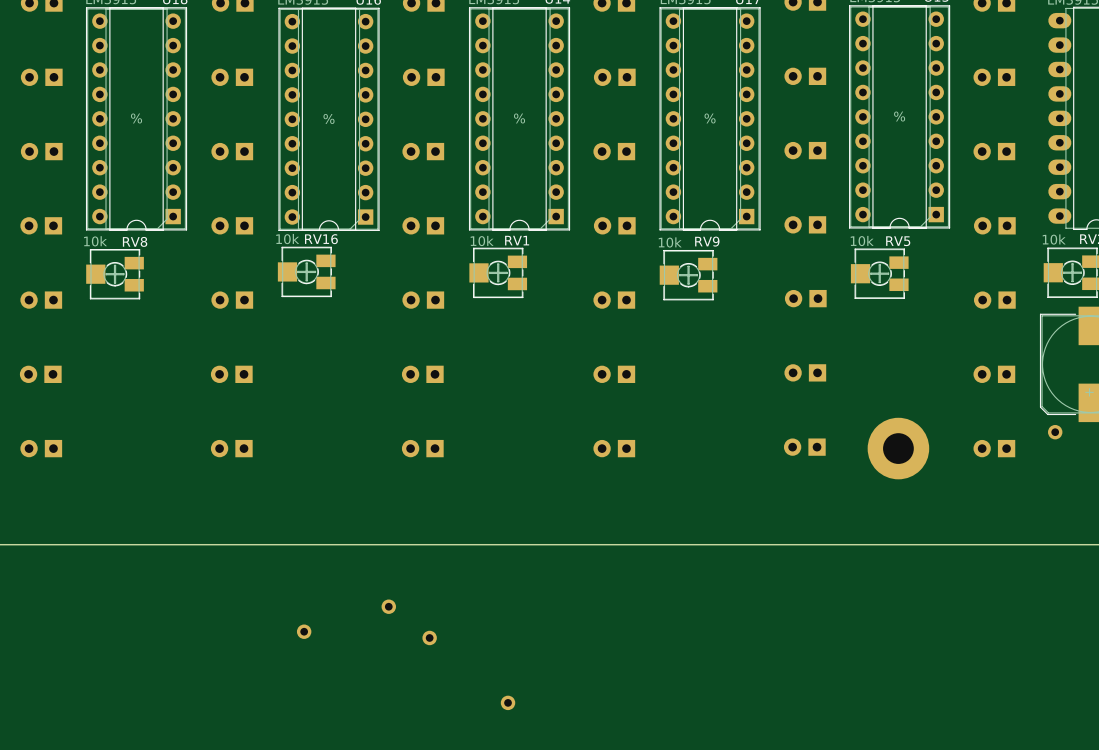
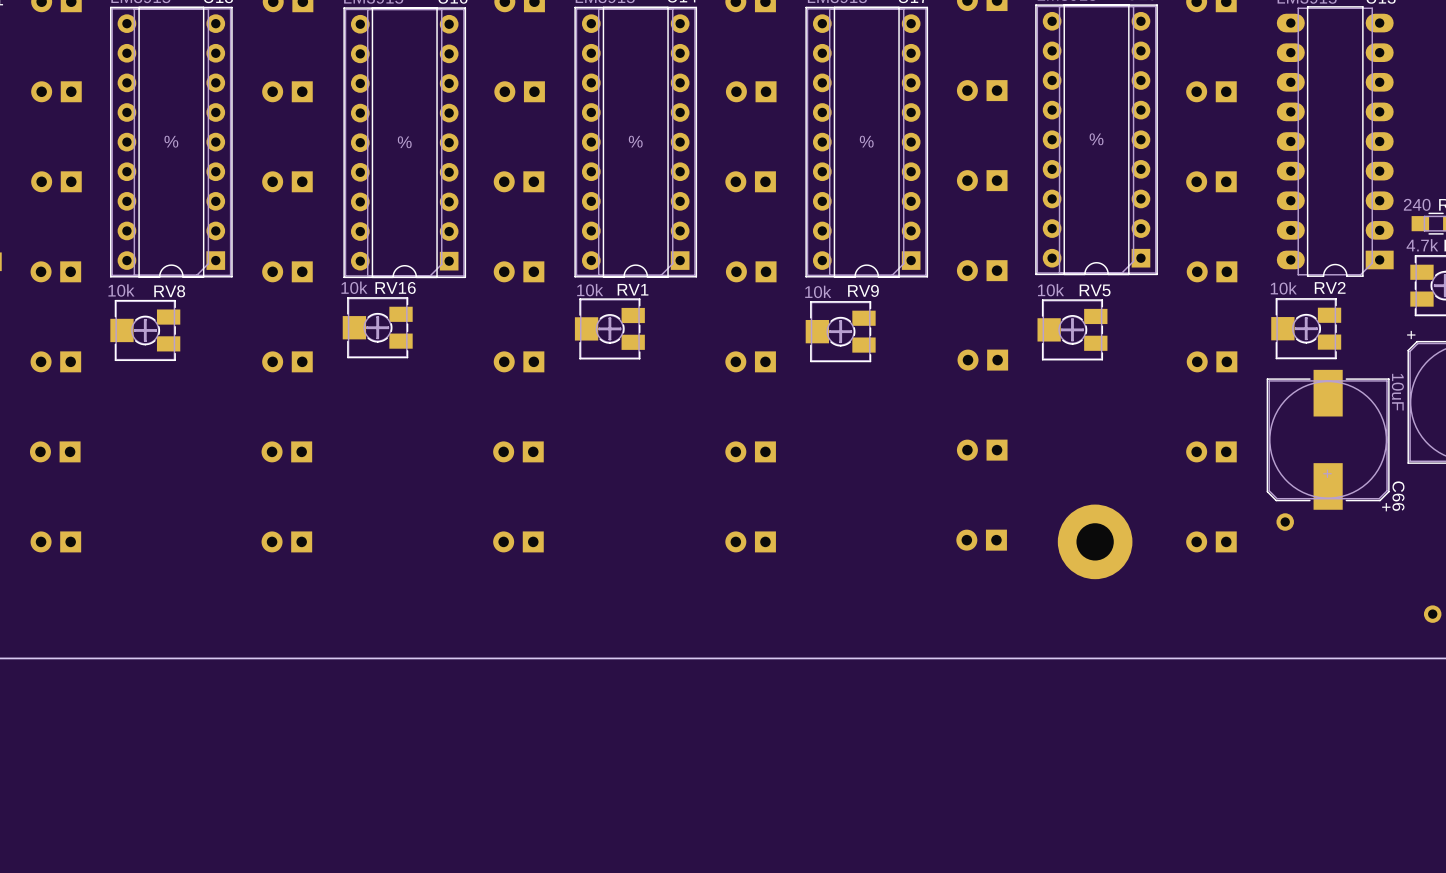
part: (388, 606) -> none
part: (304, 631) -> none
part: (429, 637) -> none
part: (508, 702) -> none

